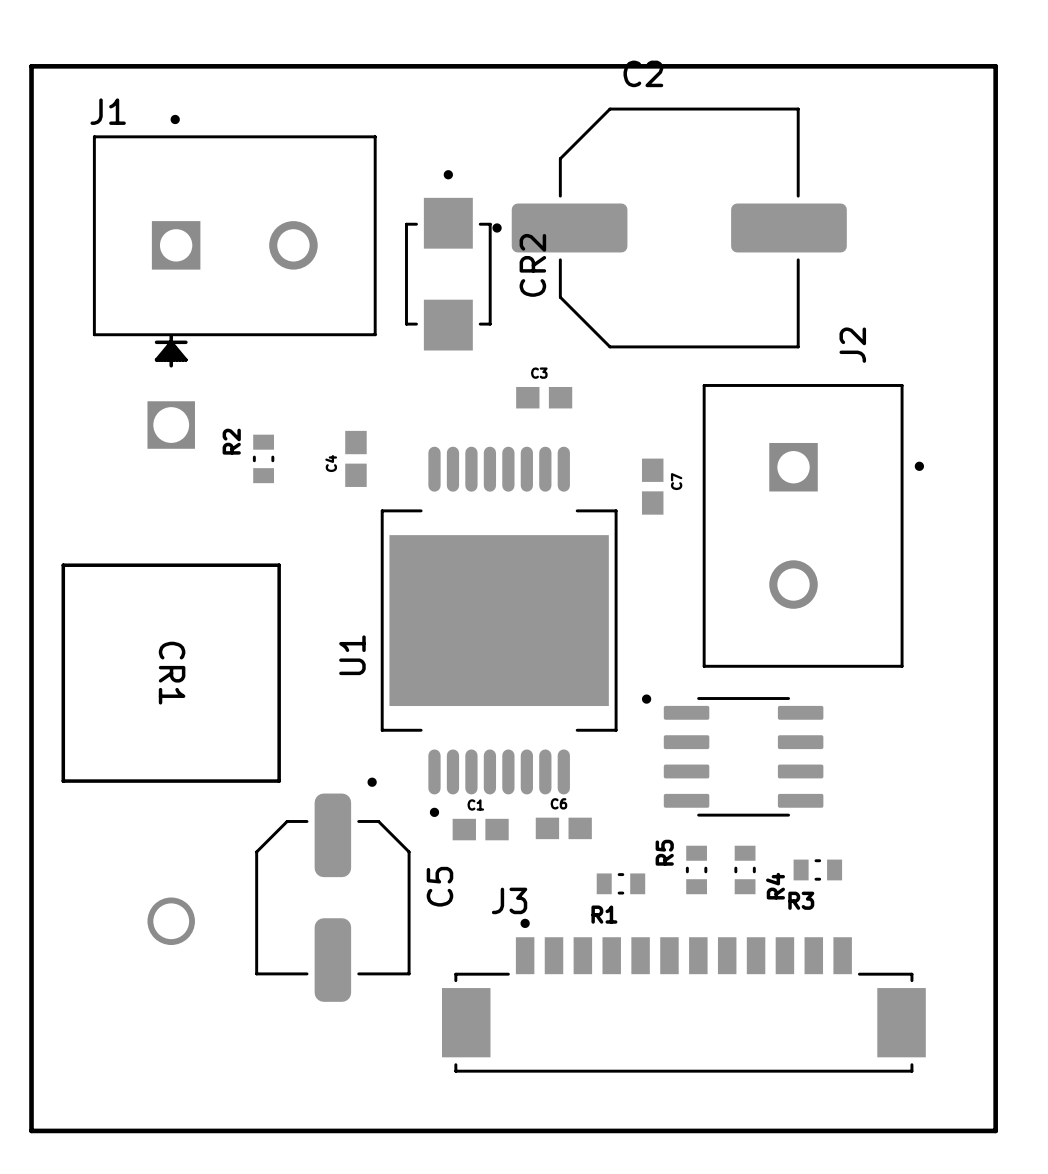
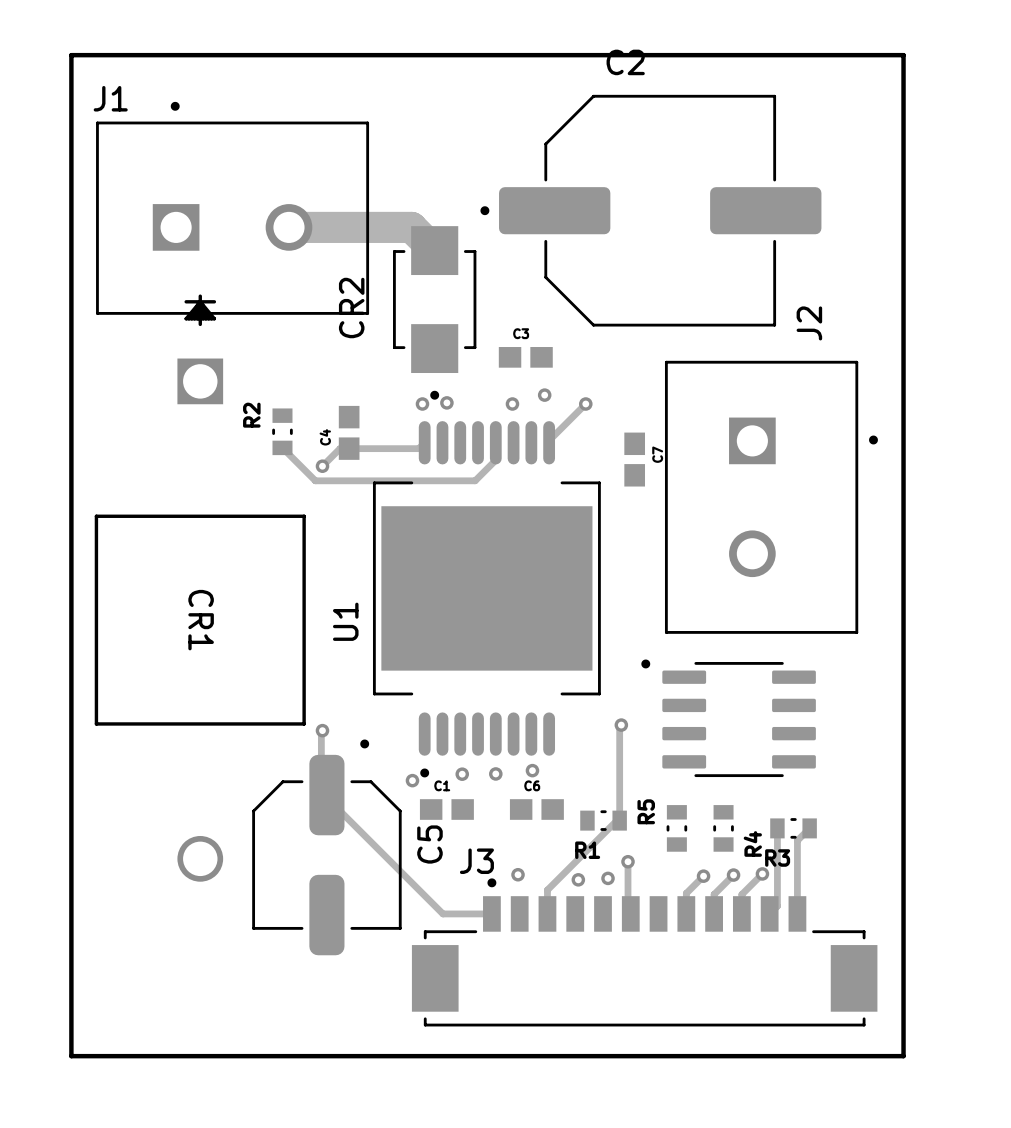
board edge: (67, 66) (31, 66) (31, 1130) (995, 1130) (995, 66) (932, 66) -> (71, 55) (71, 1056) (903, 1056) (903, 55)
track: none -> (288, 227) (411, 227) (434, 250)
CR2 rotation: 0° (448, 260) -> 180° (434, 312)
C3 position: (544, 397) -> (525, 357)
via: none -> (544, 395)
via: none -> (446, 402)
via: none -> (422, 404)
via: none -> (512, 404)
track: none -> (585, 404) (549, 442)
via: none -> (585, 404)
track: none -> (495, 425) (495, 460) (475, 480) (315, 480) (282, 447)
R2 position: (263, 458) -> (282, 431)
track: none -> (424, 442) (418, 448) (340, 448) (322, 466)
via: none -> (322, 466)
J2 position: (813, 525) -> (771, 497)
CR1 position: (171, 639) -> (200, 588)
part position: (732, 755) -> (728, 718)
track: none -> (621, 725) (619, 726) (619, 820) (616, 820) (547, 890) (547, 913)
via: none -> (621, 725)
track: none -> (322, 730) (321, 792) (442, 913) (491, 913)
via: none -> (322, 730)
via: none -> (532, 770)
via: none -> (462, 774)
via: none -> (495, 773)
via: none -> (412, 780)
C6 position: (563, 828) -> (536, 809)
C1 position: (480, 829) -> (446, 809)
track: none -> (777, 828) (777, 906) (769, 913)
track: none -> (809, 828) (797, 840) (797, 913)
R1 position: (620, 883) -> (603, 820)
track: none -> (628, 861) (628, 911) (630, 913)
via: none -> (628, 861)
track: none -> (762, 873) (741, 894) (741, 913)
via: none -> (762, 873)
via: none -> (518, 874)
track: none -> (733, 875) (714, 894) (714, 913)
via: none -> (733, 875)
track: none -> (703, 876) (686, 893) (686, 913)
via: none -> (703, 876)
via: none -> (608, 878)
via: none -> (578, 879)
J3 position: (683, 995) -> (644, 952)

